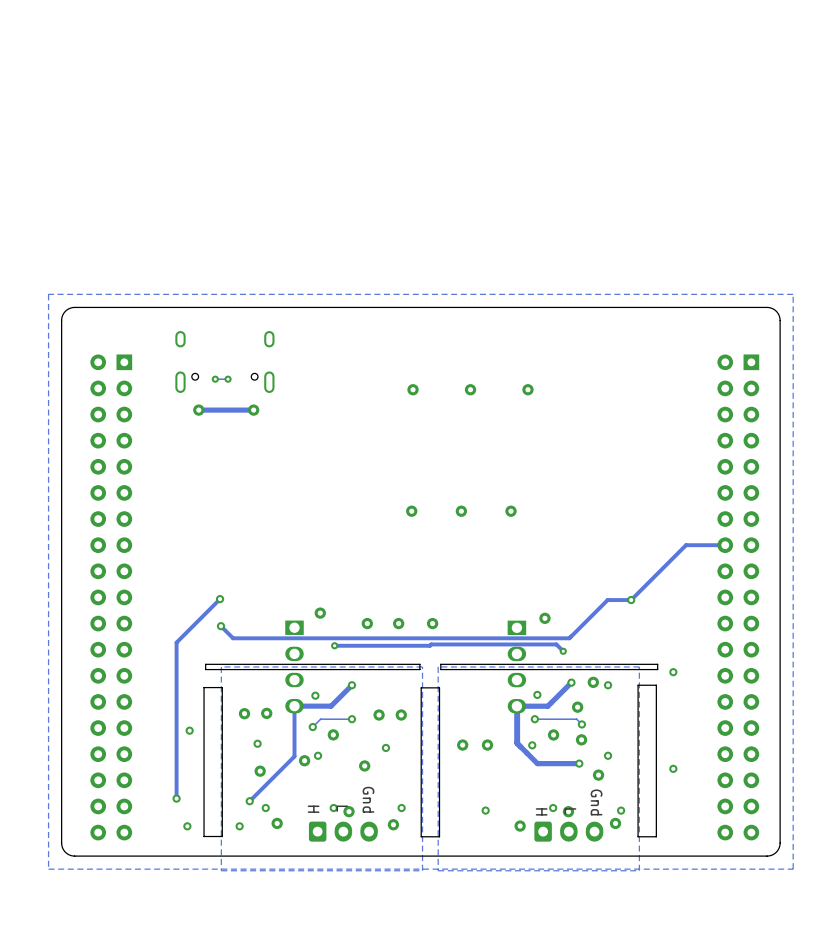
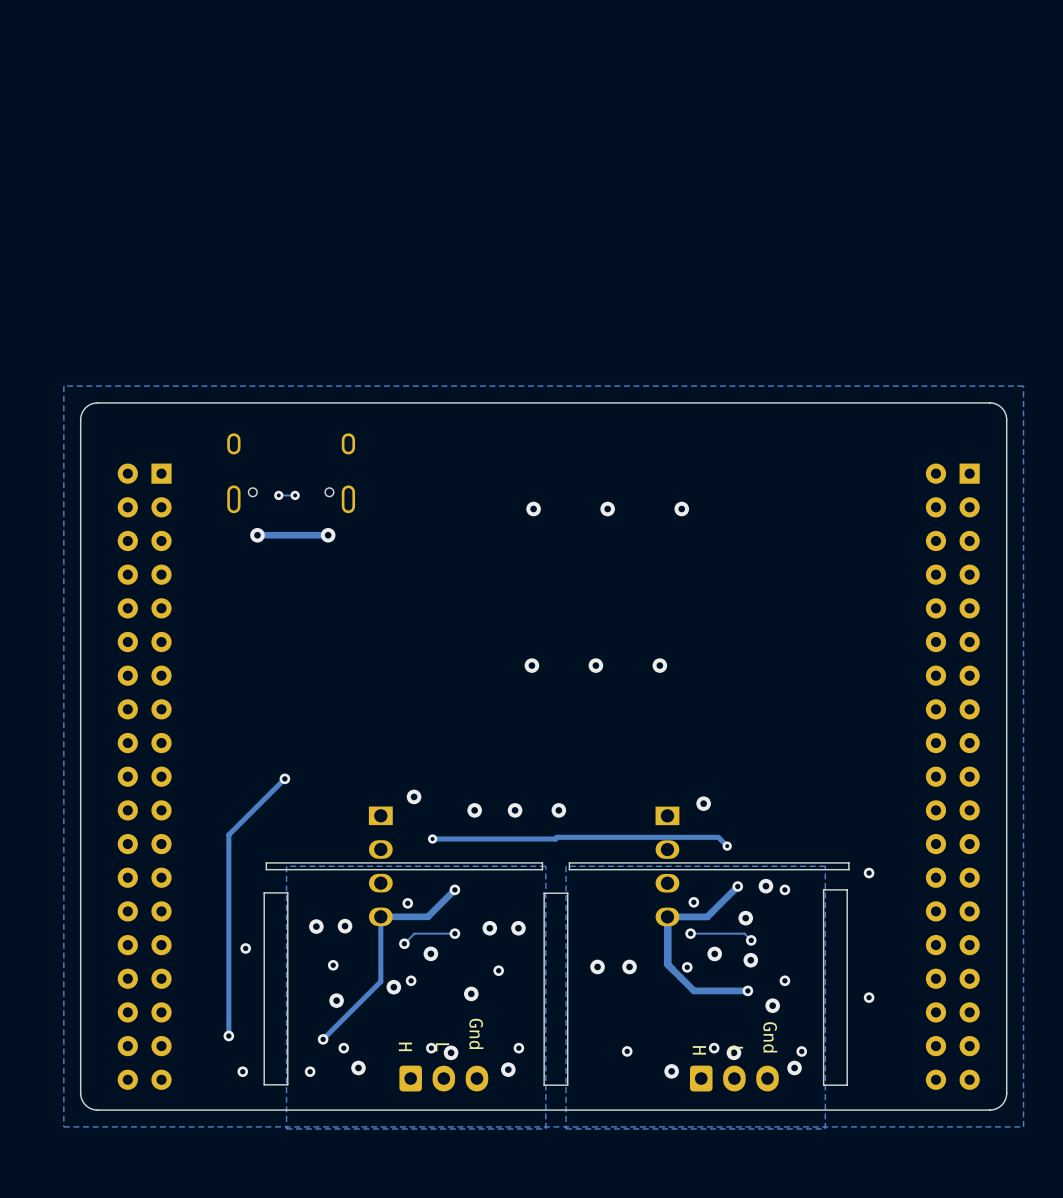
track: (725, 545) (686, 545) (631, 600) (607, 600) (569, 638) (233, 638) (221, 626) -> none
via: (631, 600) -> none
via: (221, 626) -> none

